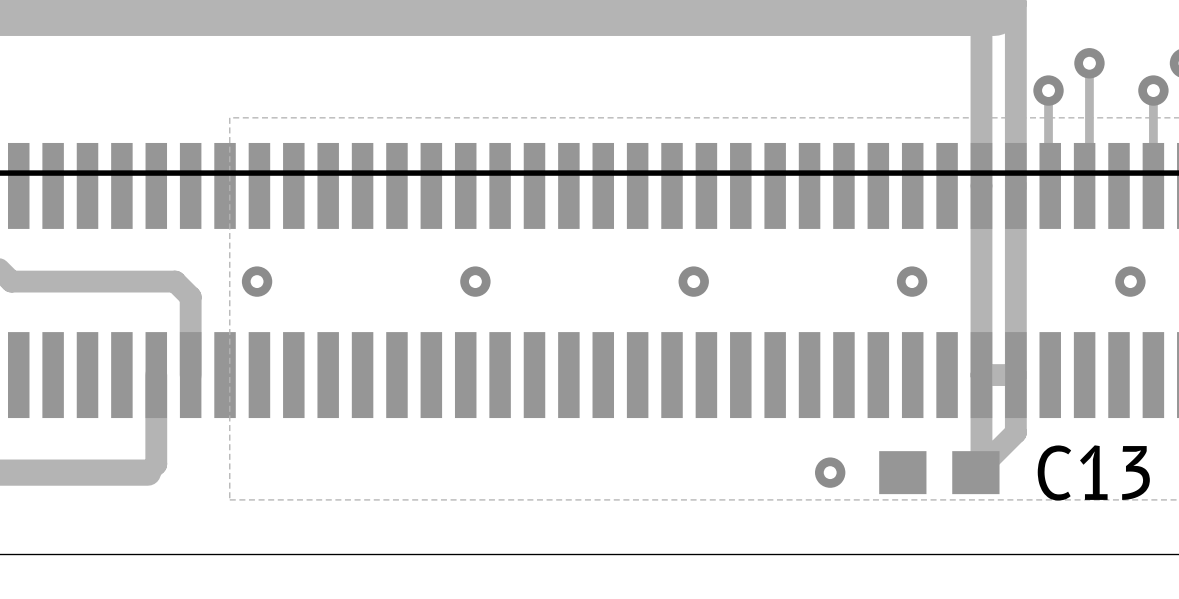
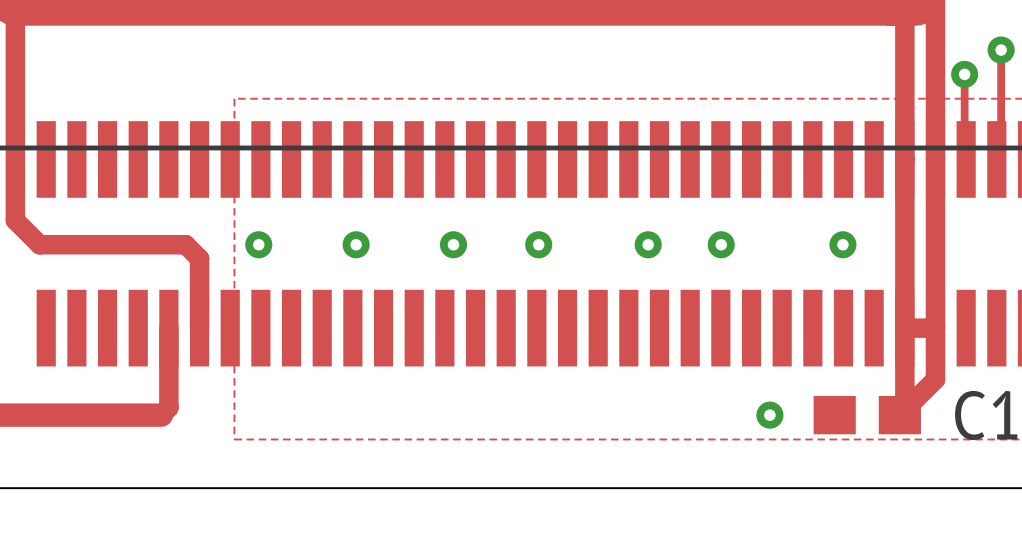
via: none -> (356, 244)
via: none -> (538, 244)
via: none -> (721, 244)

